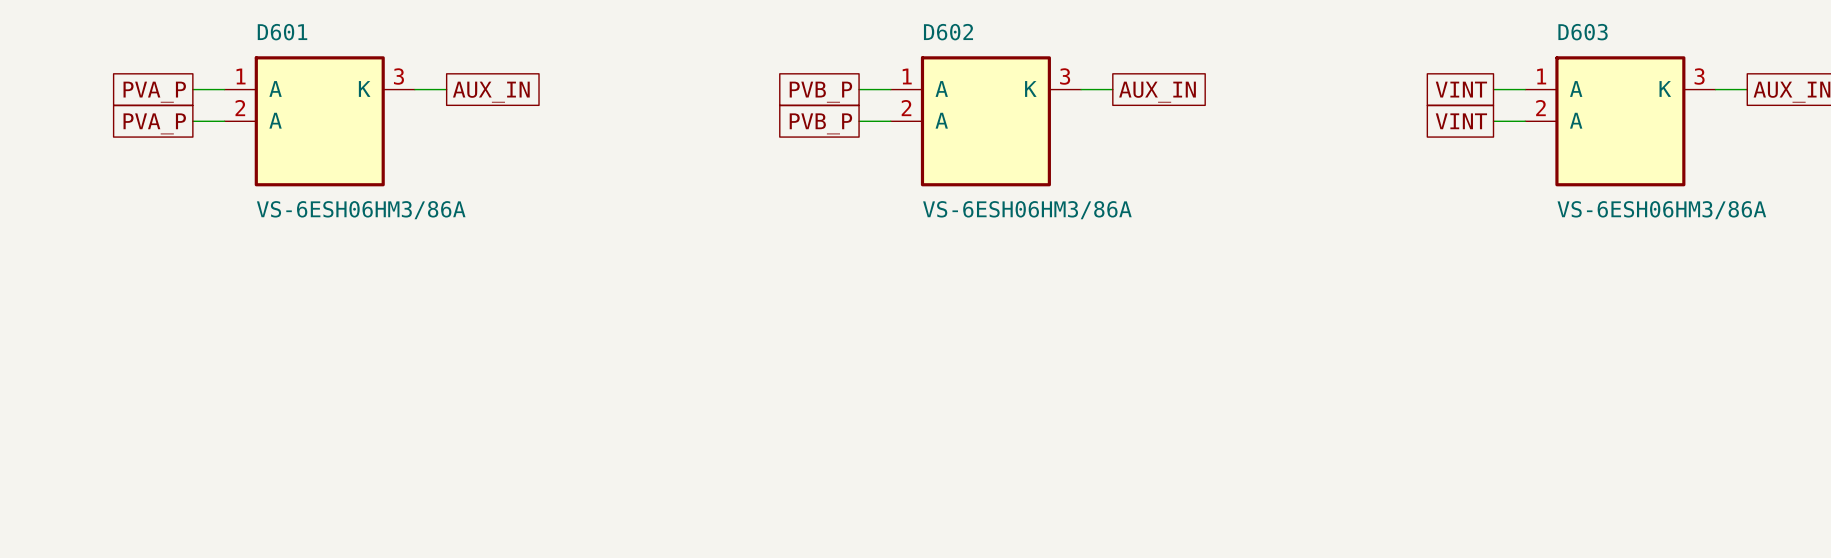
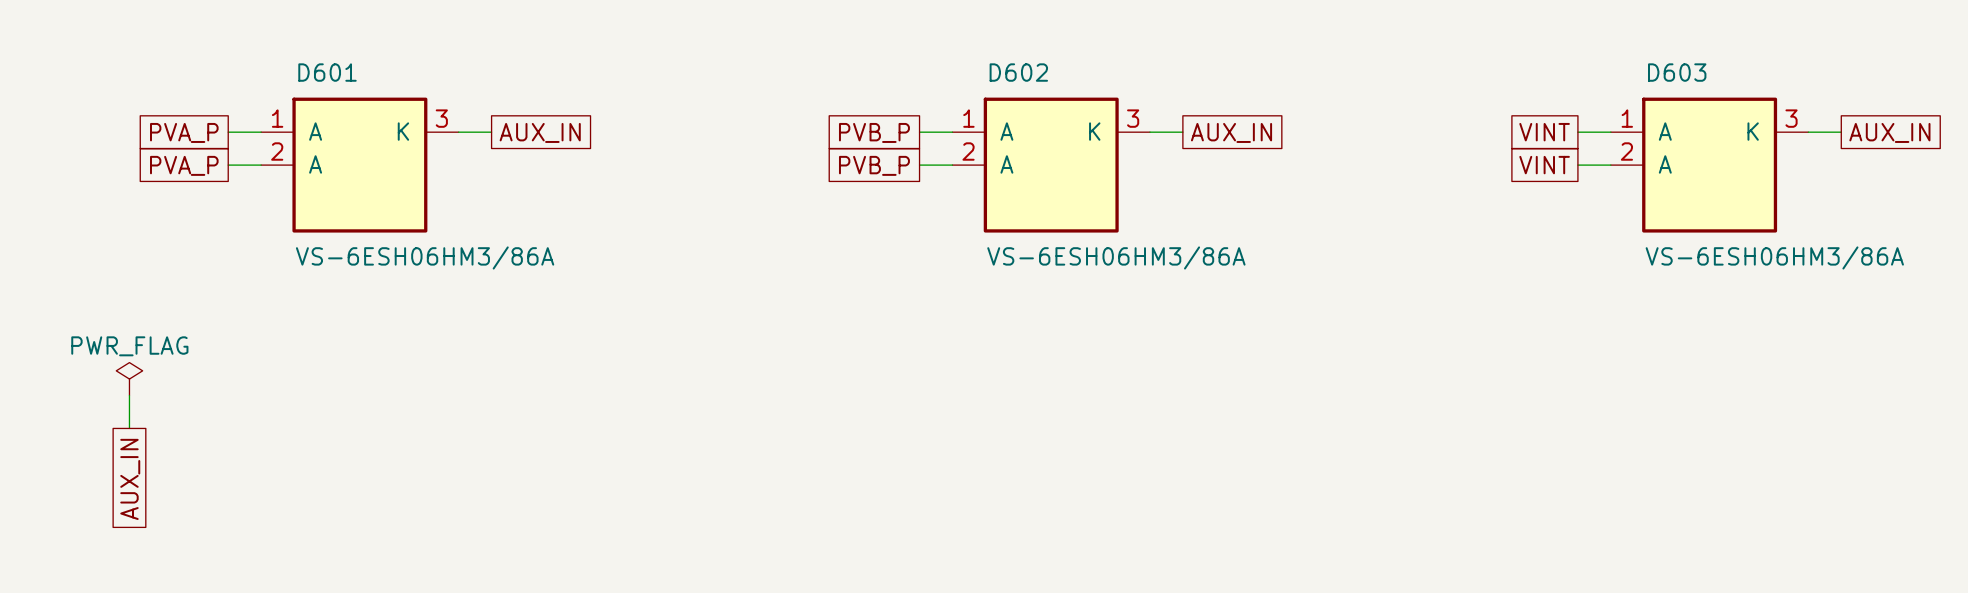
power symbol: none -> PWR_FLAG (129, 379)
wire: none -> (129, 395) (129, 428)
global label: none -> AUX_IN (130, 479)

